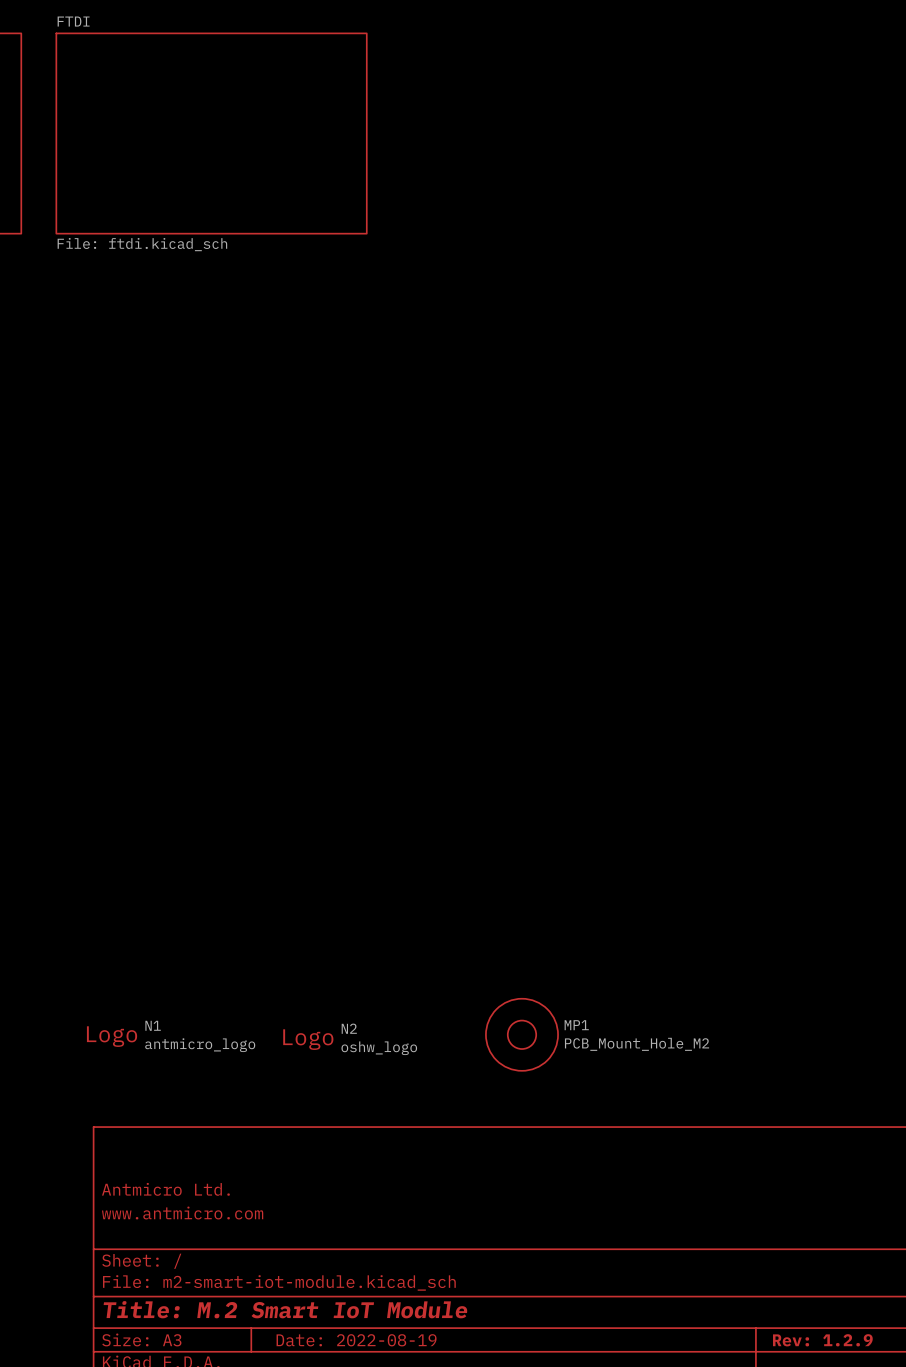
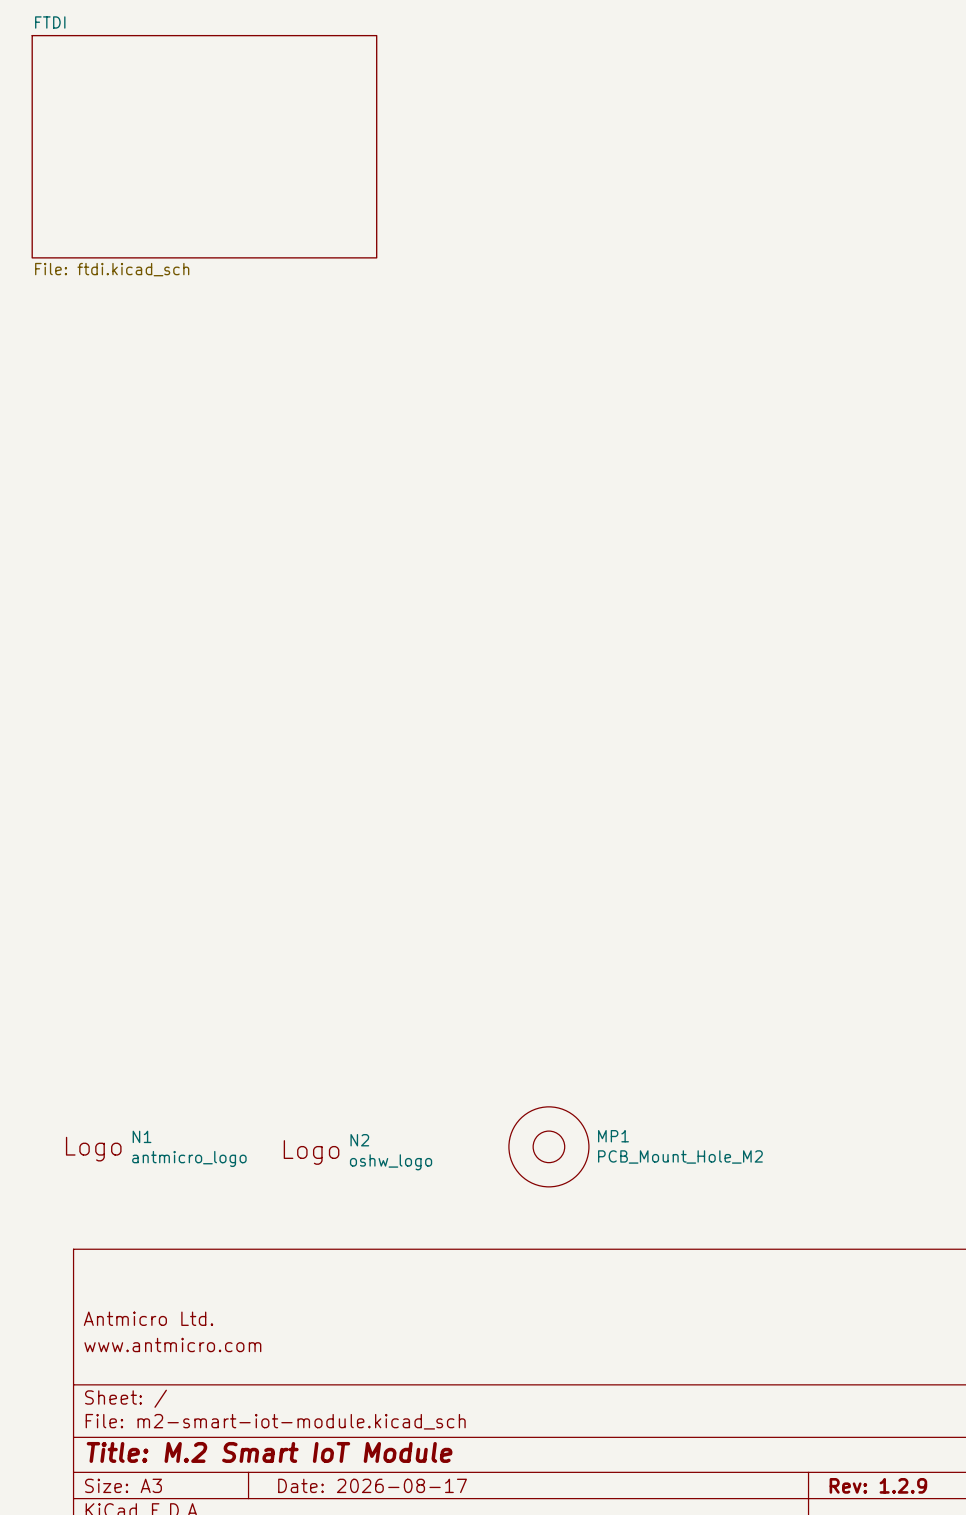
title block: Date: 2022-08-19 (356, 1340) -> Date: 2026-08-17 (372, 1485)

